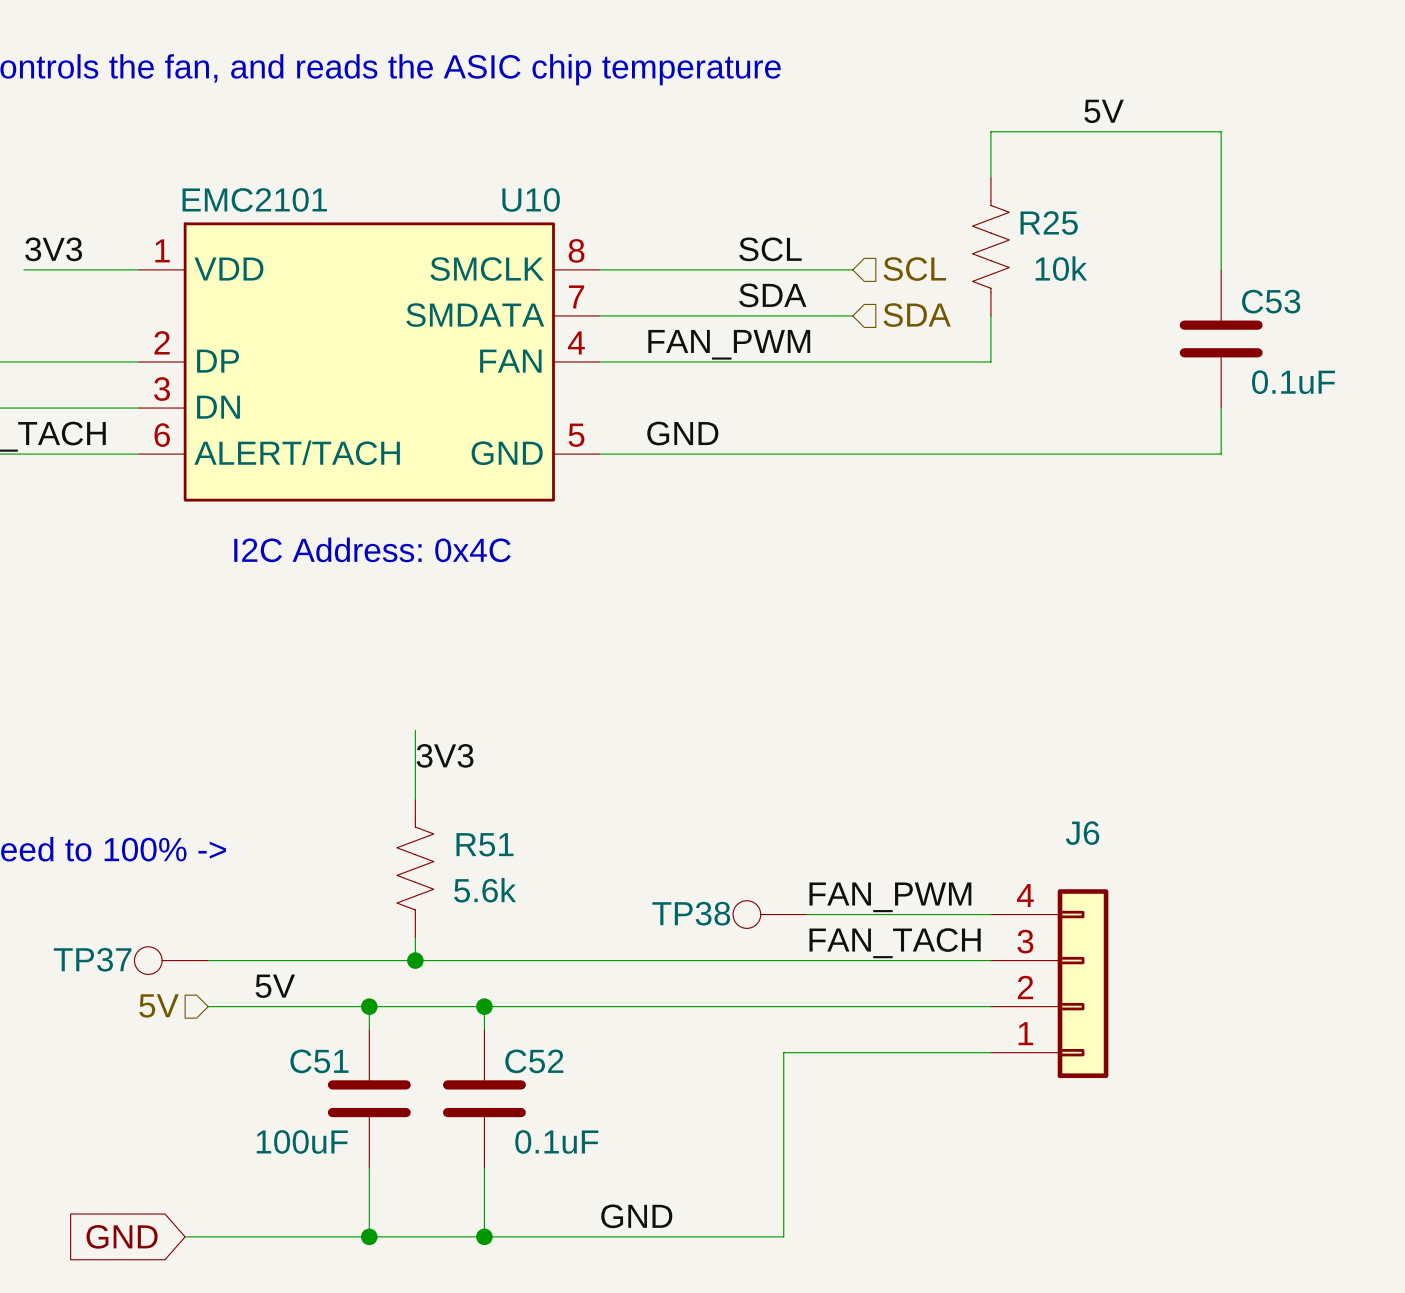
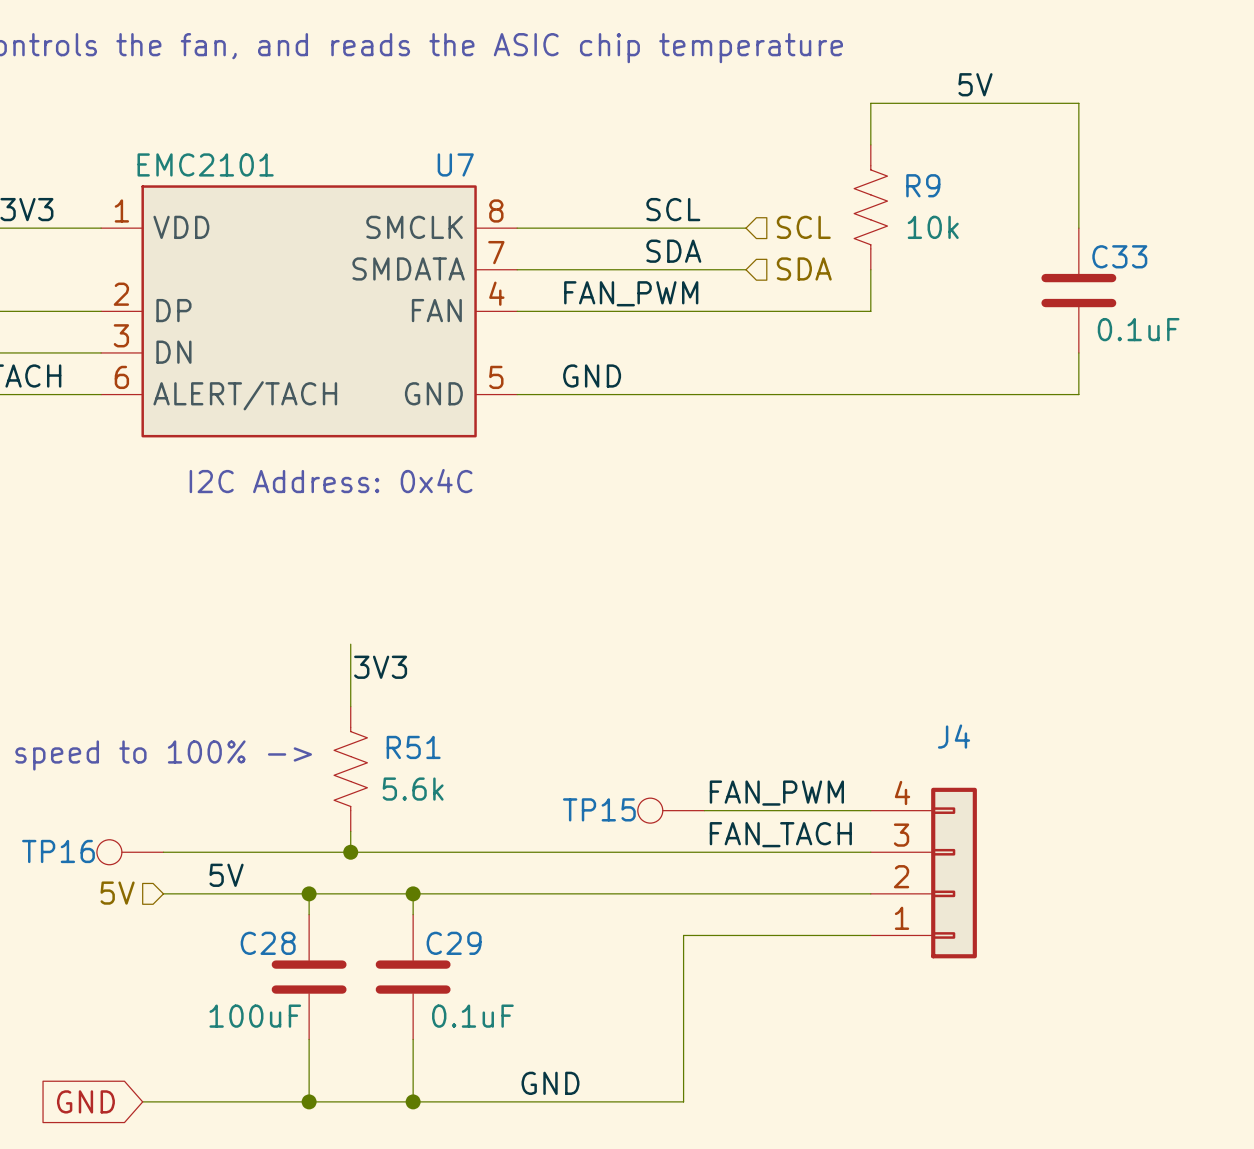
U10 name: U10 (531, 199) -> U7 (455, 164)
R25 name: R25 (1049, 222) -> R9 (923, 185)
C53 name: C53 (1271, 301) -> C33 (1119, 256)
J6 name: J6 (1082, 833) -> J4 (954, 736)
TP38 name: TP38 (691, 913) -> TP15 (599, 809)
TP37 name: TP37 (92, 959) -> TP16 (58, 851)
C51 name: C51 (319, 1061) -> C28 (268, 943)
C52 name: C52 (534, 1061) -> C29 (454, 943)

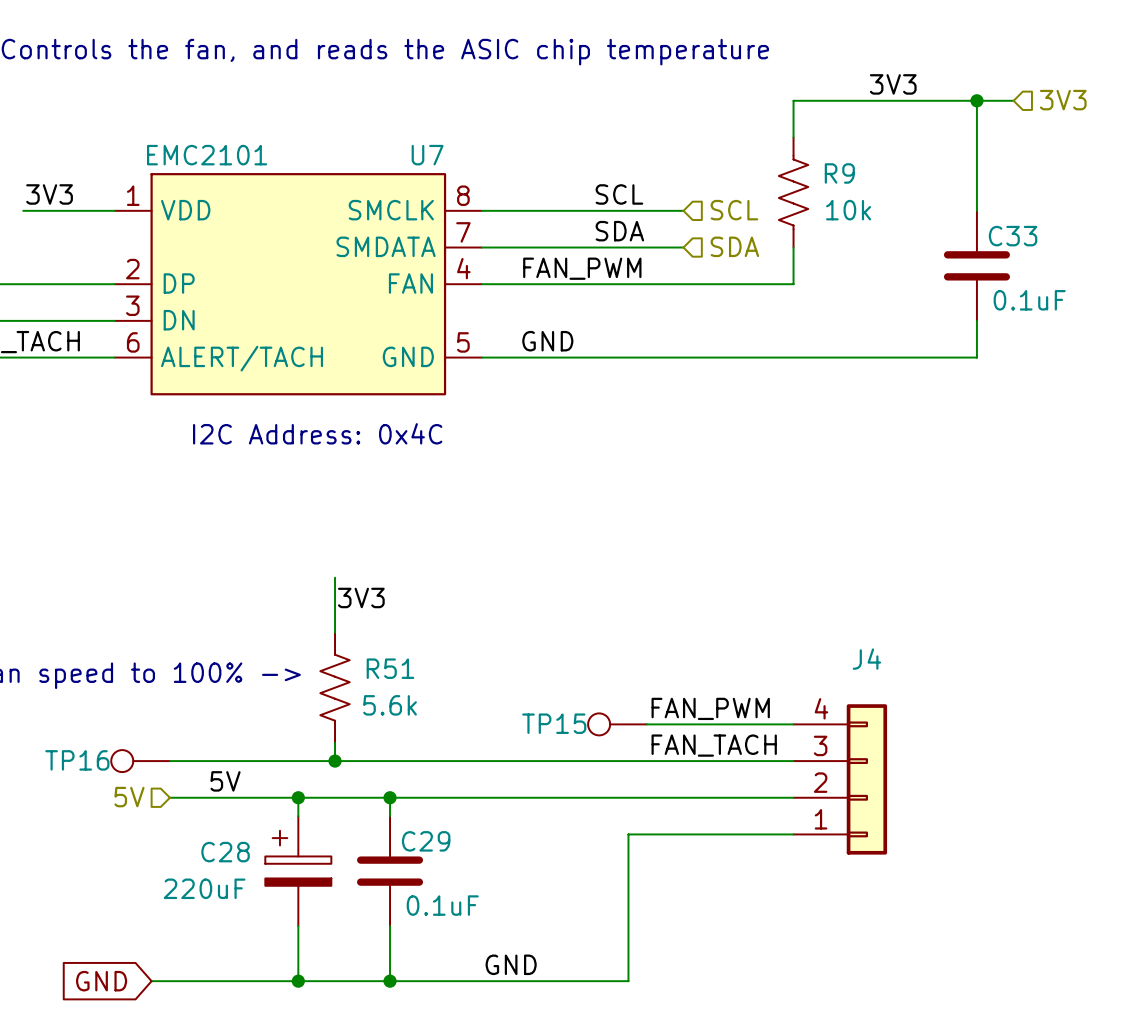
label: 5V (975, 84) -> 3V3 (893, 84)
hierarchical label: none -> 3V3 (1063, 100)
wire: none -> (976, 100) (1013, 100)
junction: none -> (976, 100)
C28 symbol: [271, 914, 347, 1040] -> [265, 816, 332, 927]
C28 name position: C28 (268, 943) -> C28 (225, 852)
C28 value: 100uF (255, 1016) -> 220uF (204, 888)

